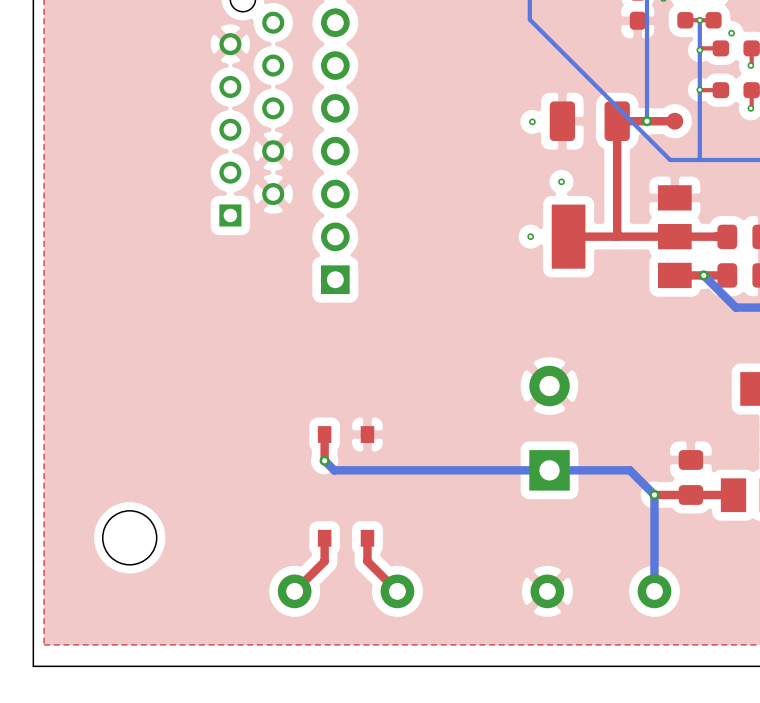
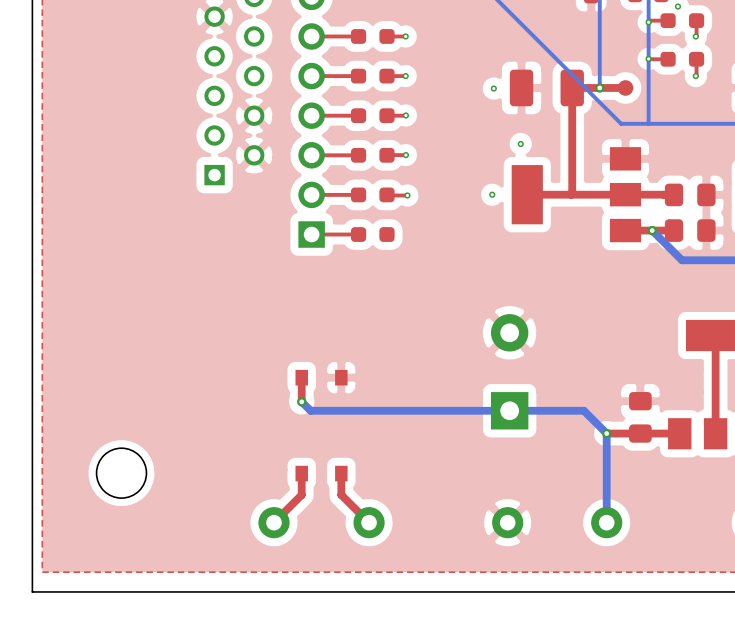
top track: none -> (358, 36) (311, 36)
part: none -> (372, 36)
top track: none -> (405, 36) (387, 36)
via: none -> (405, 36)
top track: none -> (358, 76) (311, 76)
part: none -> (372, 76)
top track: none -> (405, 76) (387, 76)
via: none -> (405, 76)
via: none -> (405, 115)
top track: none -> (358, 115) (311, 115)
part: none -> (372, 115)
top track: none -> (405, 115) (387, 115)
top track: none -> (405, 155) (387, 155)
via: none -> (405, 155)
top track: none -> (358, 155) (311, 155)
part: none -> (372, 155)
top track: none -> (358, 194) (311, 194)
part: none -> (372, 194)
top track: none -> (387, 194) (407, 195)
via: none -> (407, 195)
top track: none -> (358, 234) (311, 234)
part: none -> (372, 234)

